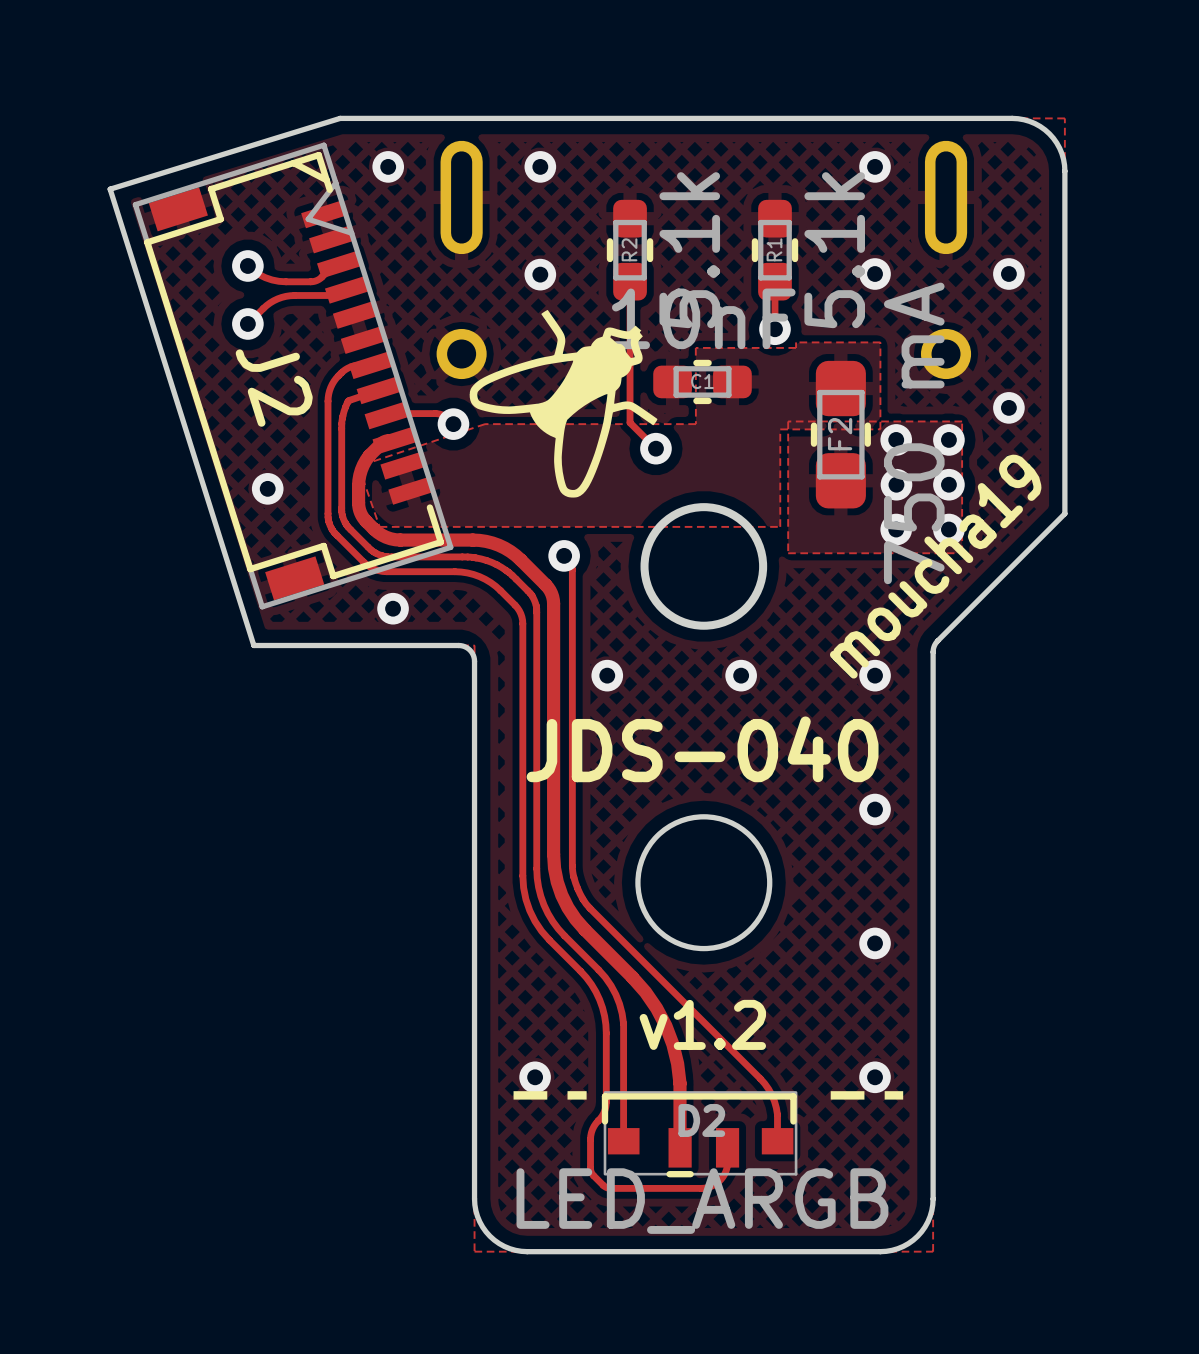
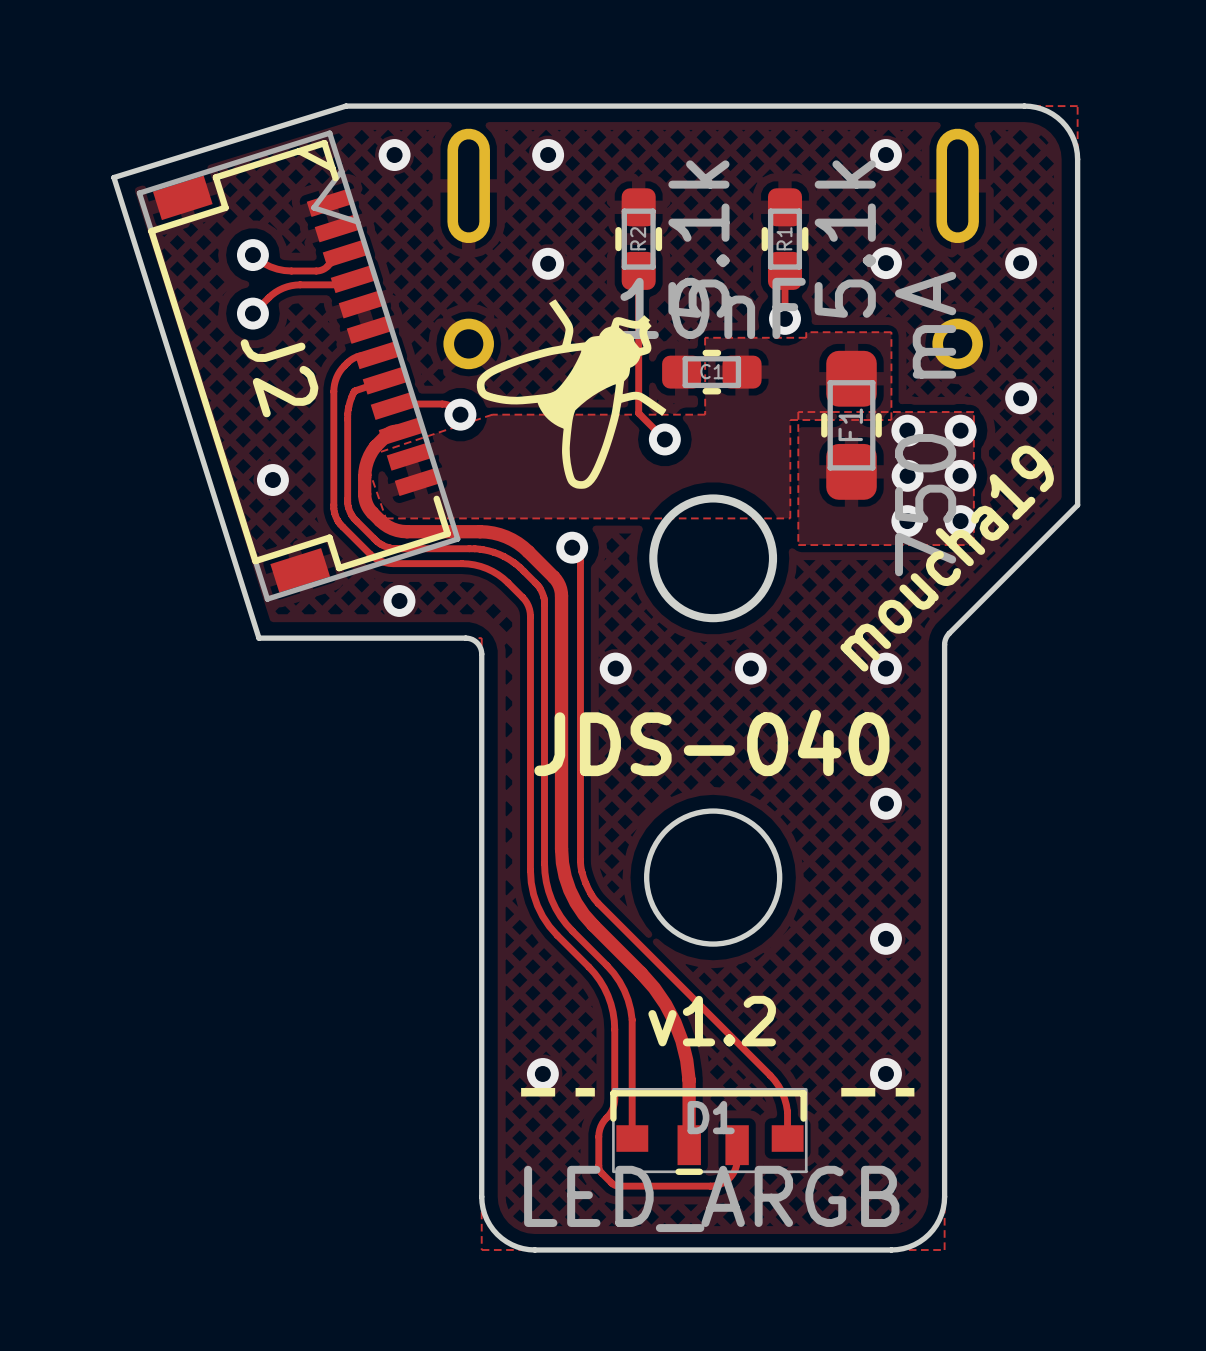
F2 name: F2 (840, 434) -> F1 (850, 424)
D2 name: D2 (701, 1120) -> D1 (711, 1117)

